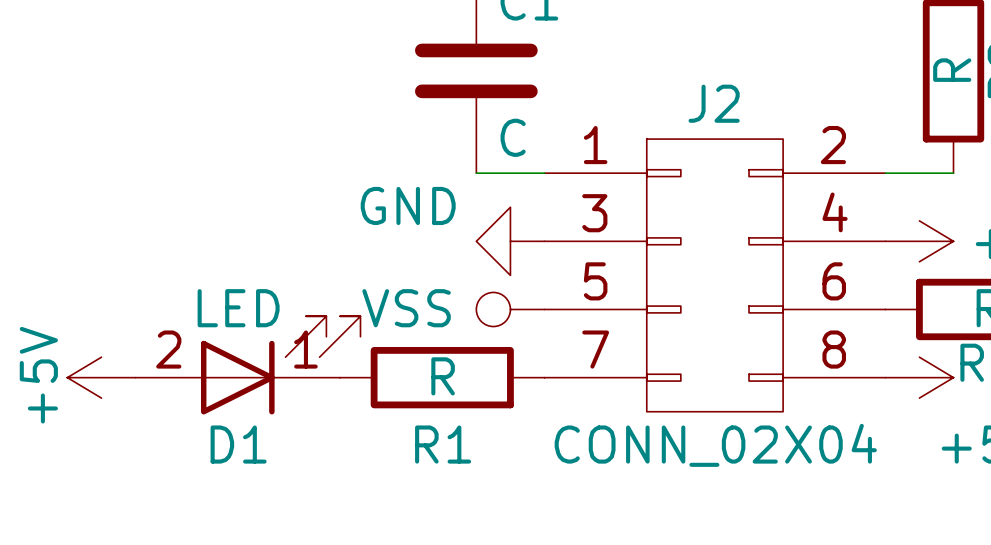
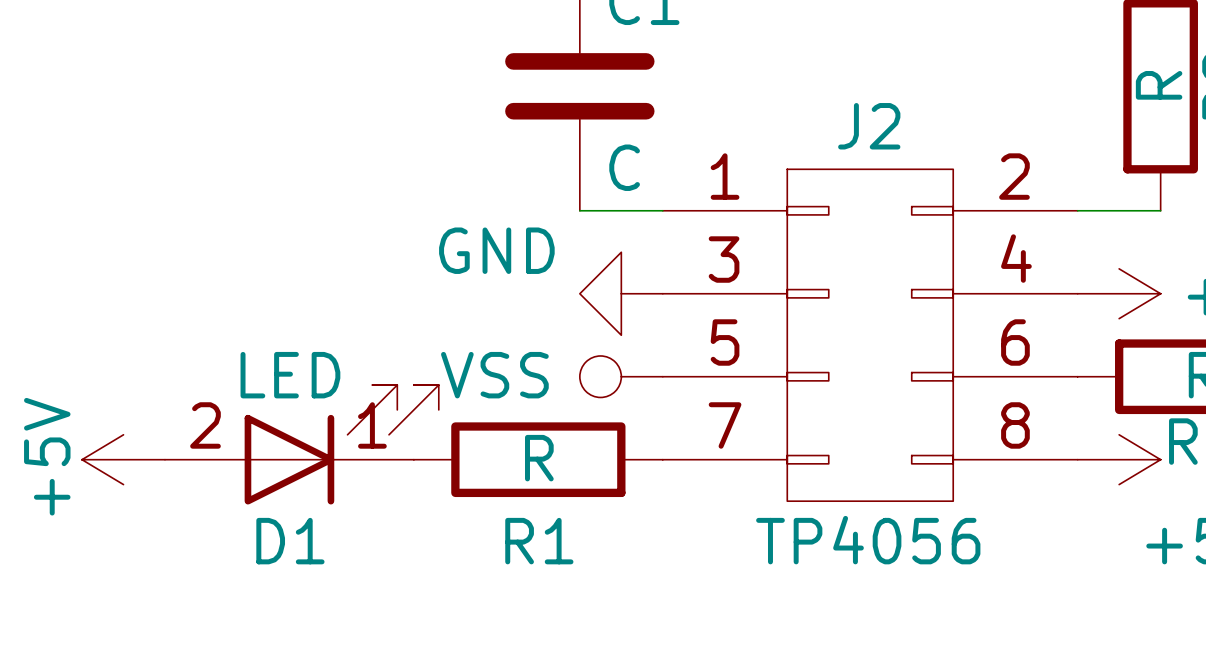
J2 value: CONN_02X04 (715, 445) -> TP4056 (868, 540)

